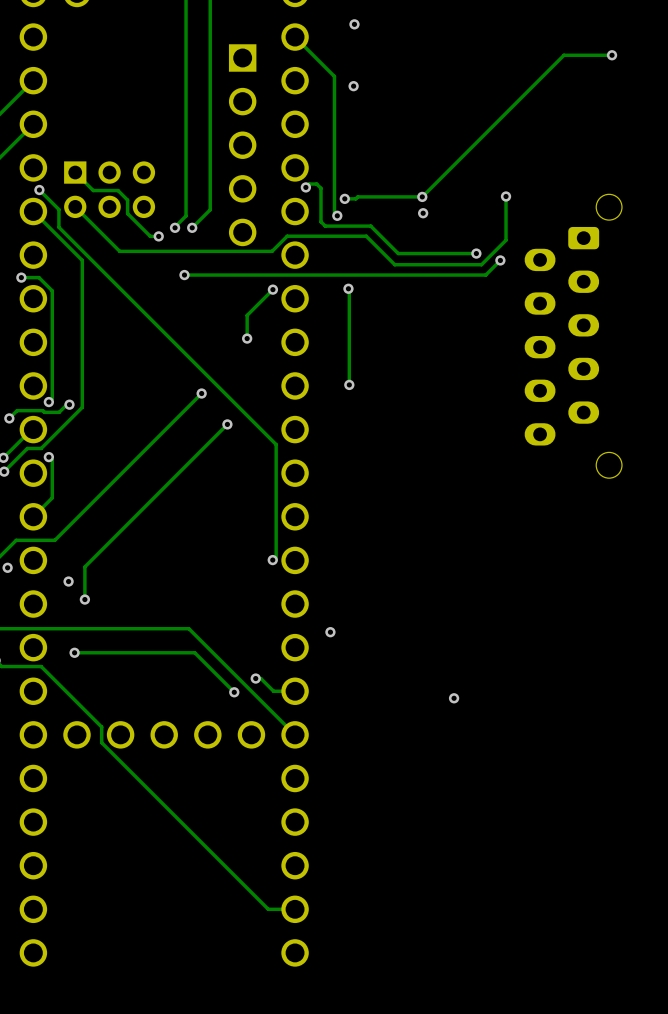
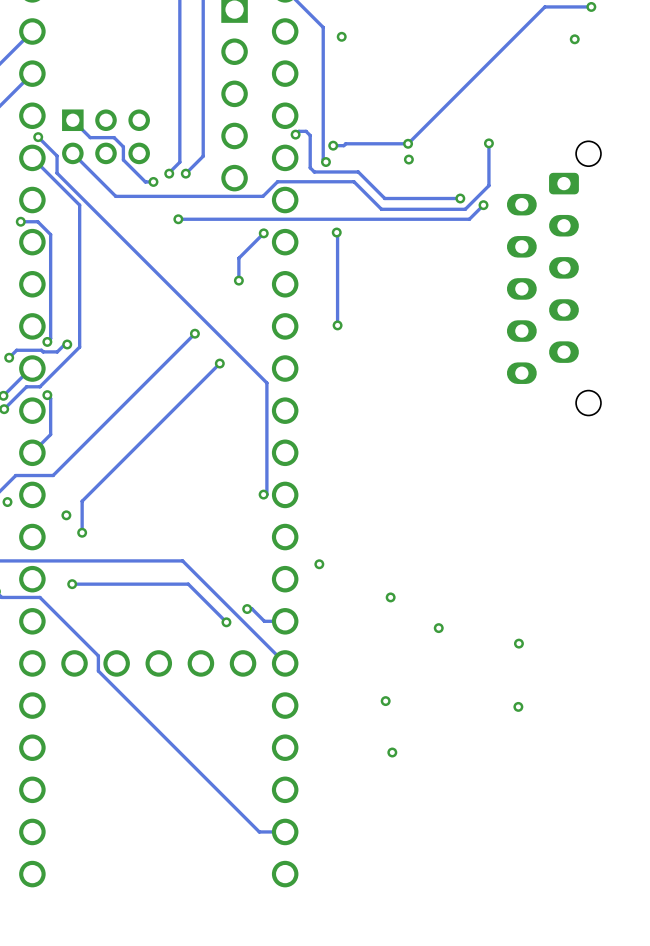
via: none -> (574, 39)
via: none -> (390, 597)
via: none -> (518, 643)
via: none -> (385, 701)
via: none -> (518, 706)
via: none -> (392, 752)

